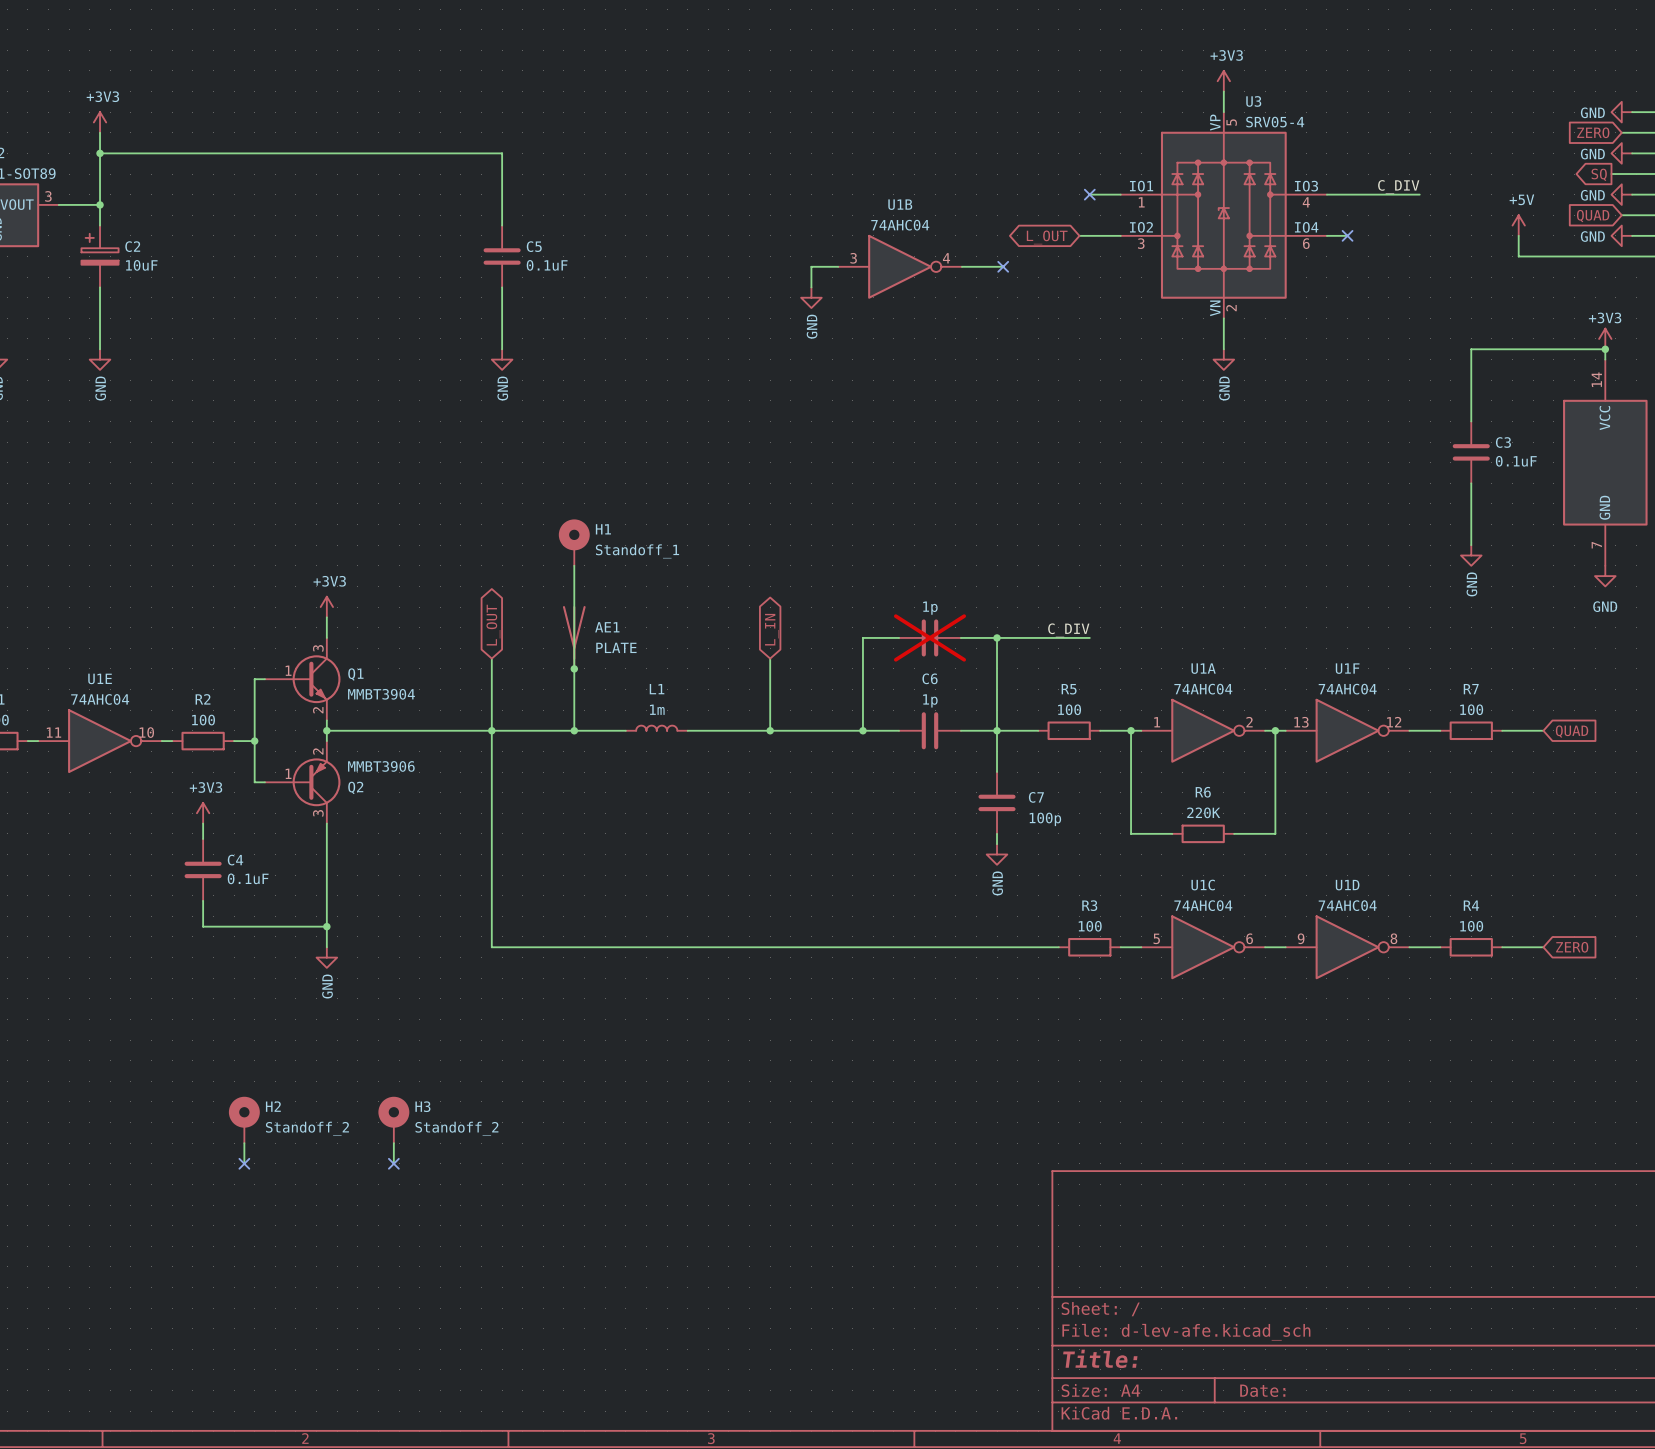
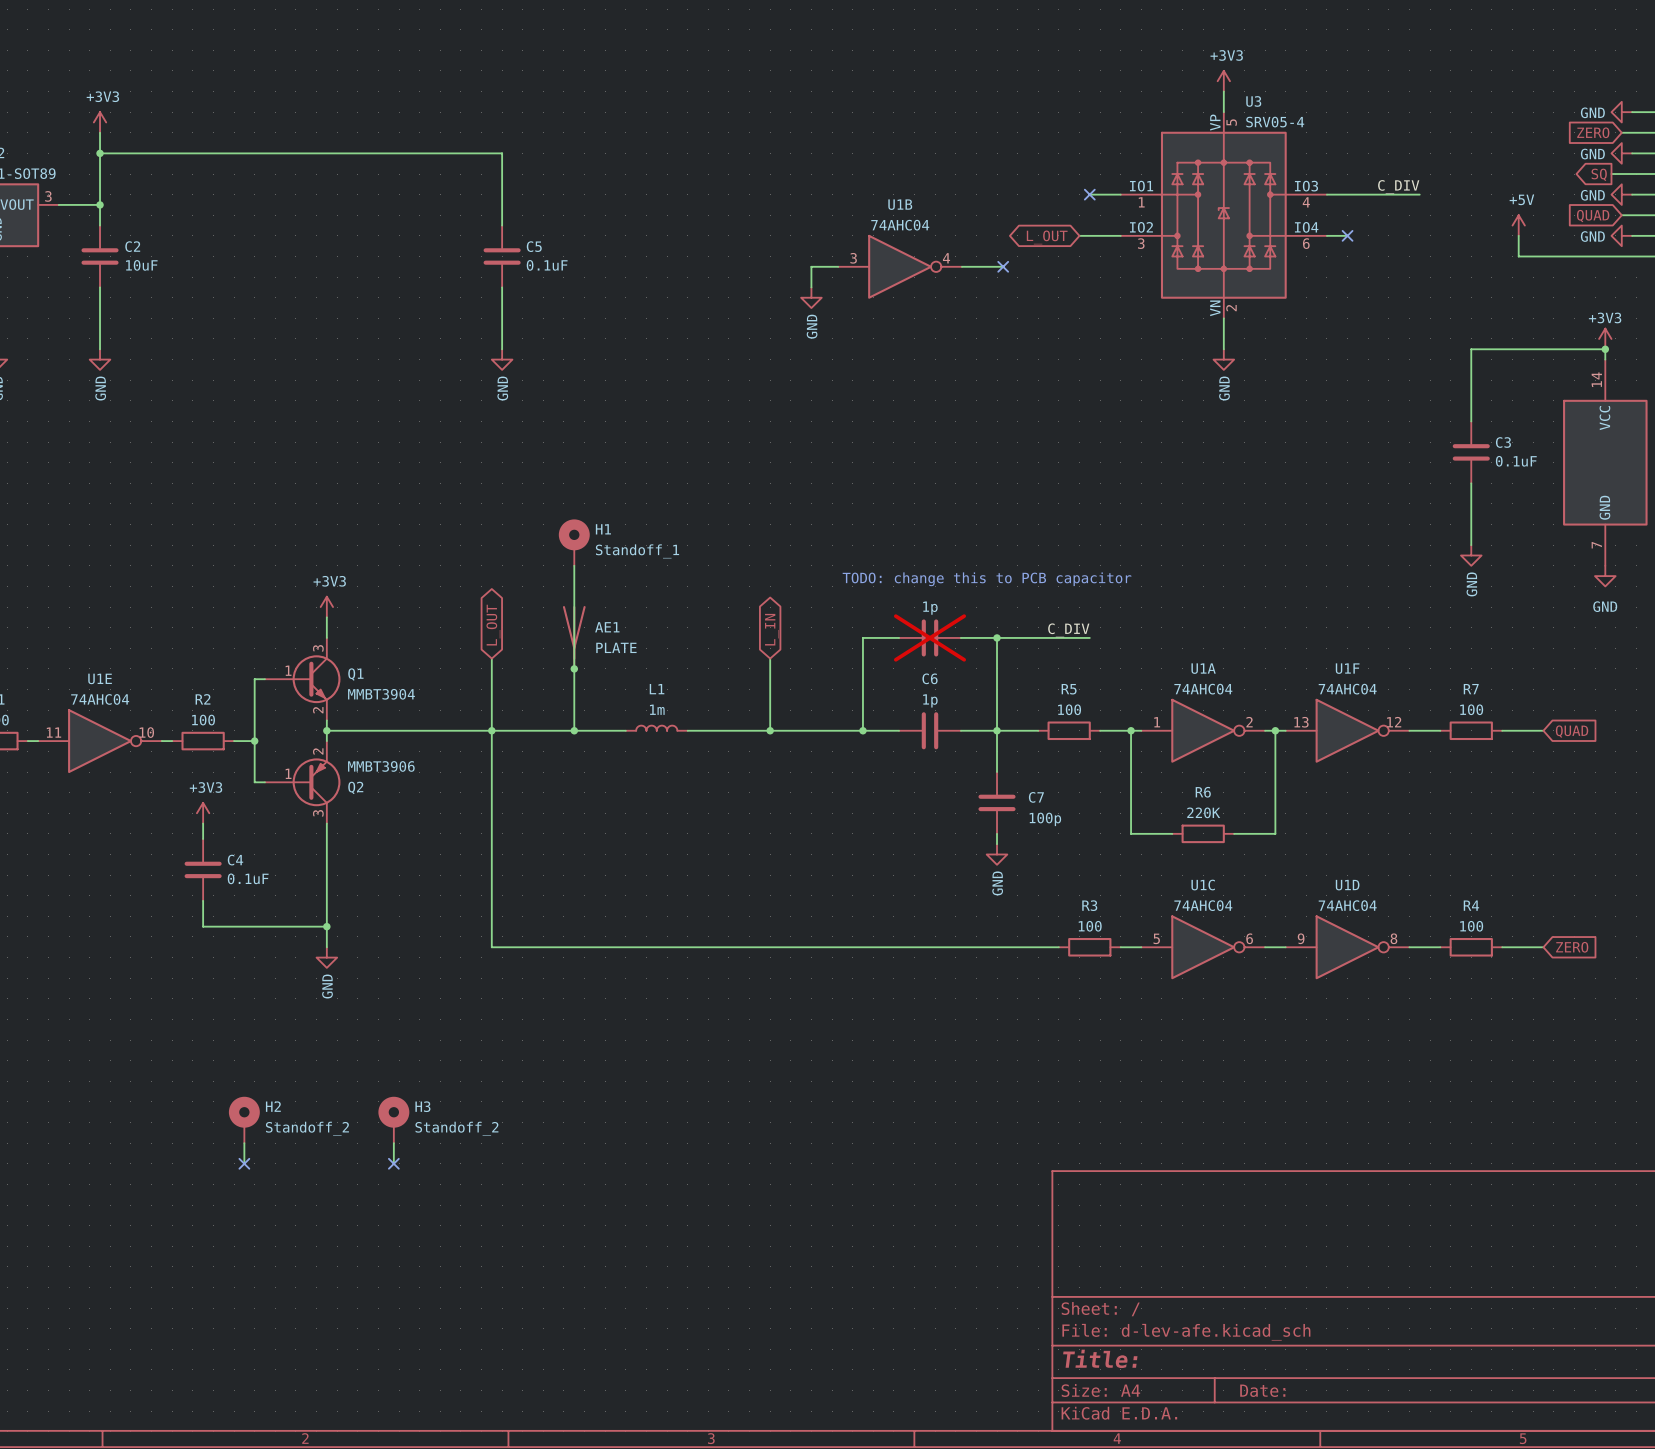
C2 symbol: [81, 225, 119, 288] -> [81, 225, 119, 288]
text: none -> TODO: change this to PCB capacitor (986, 579)

